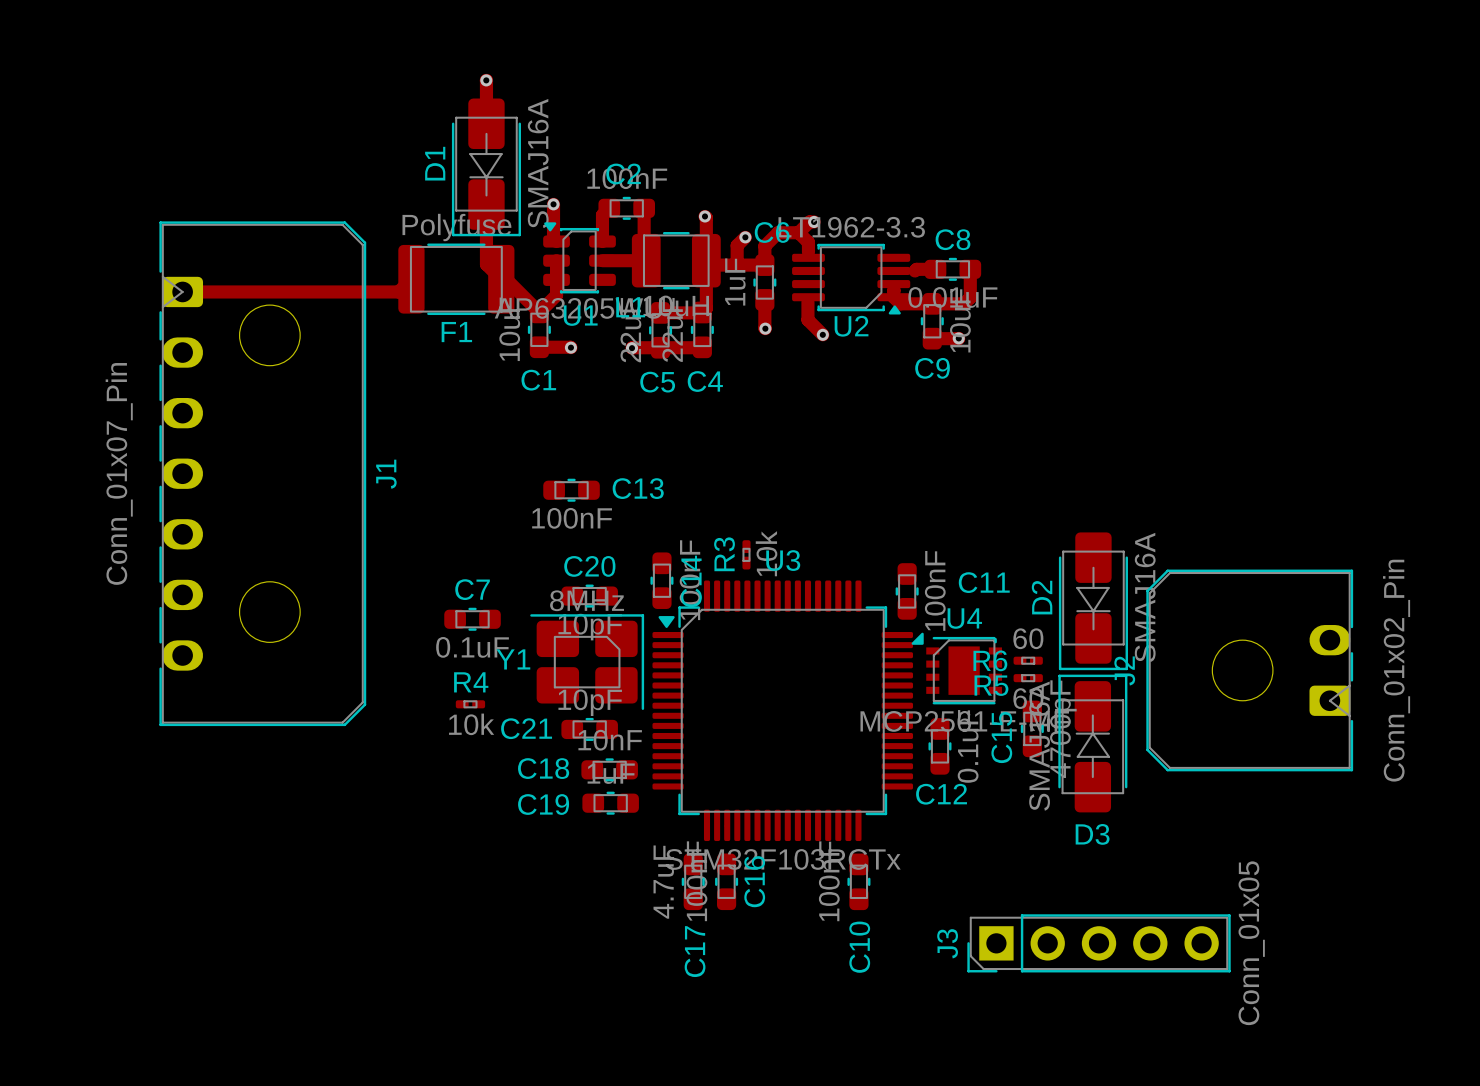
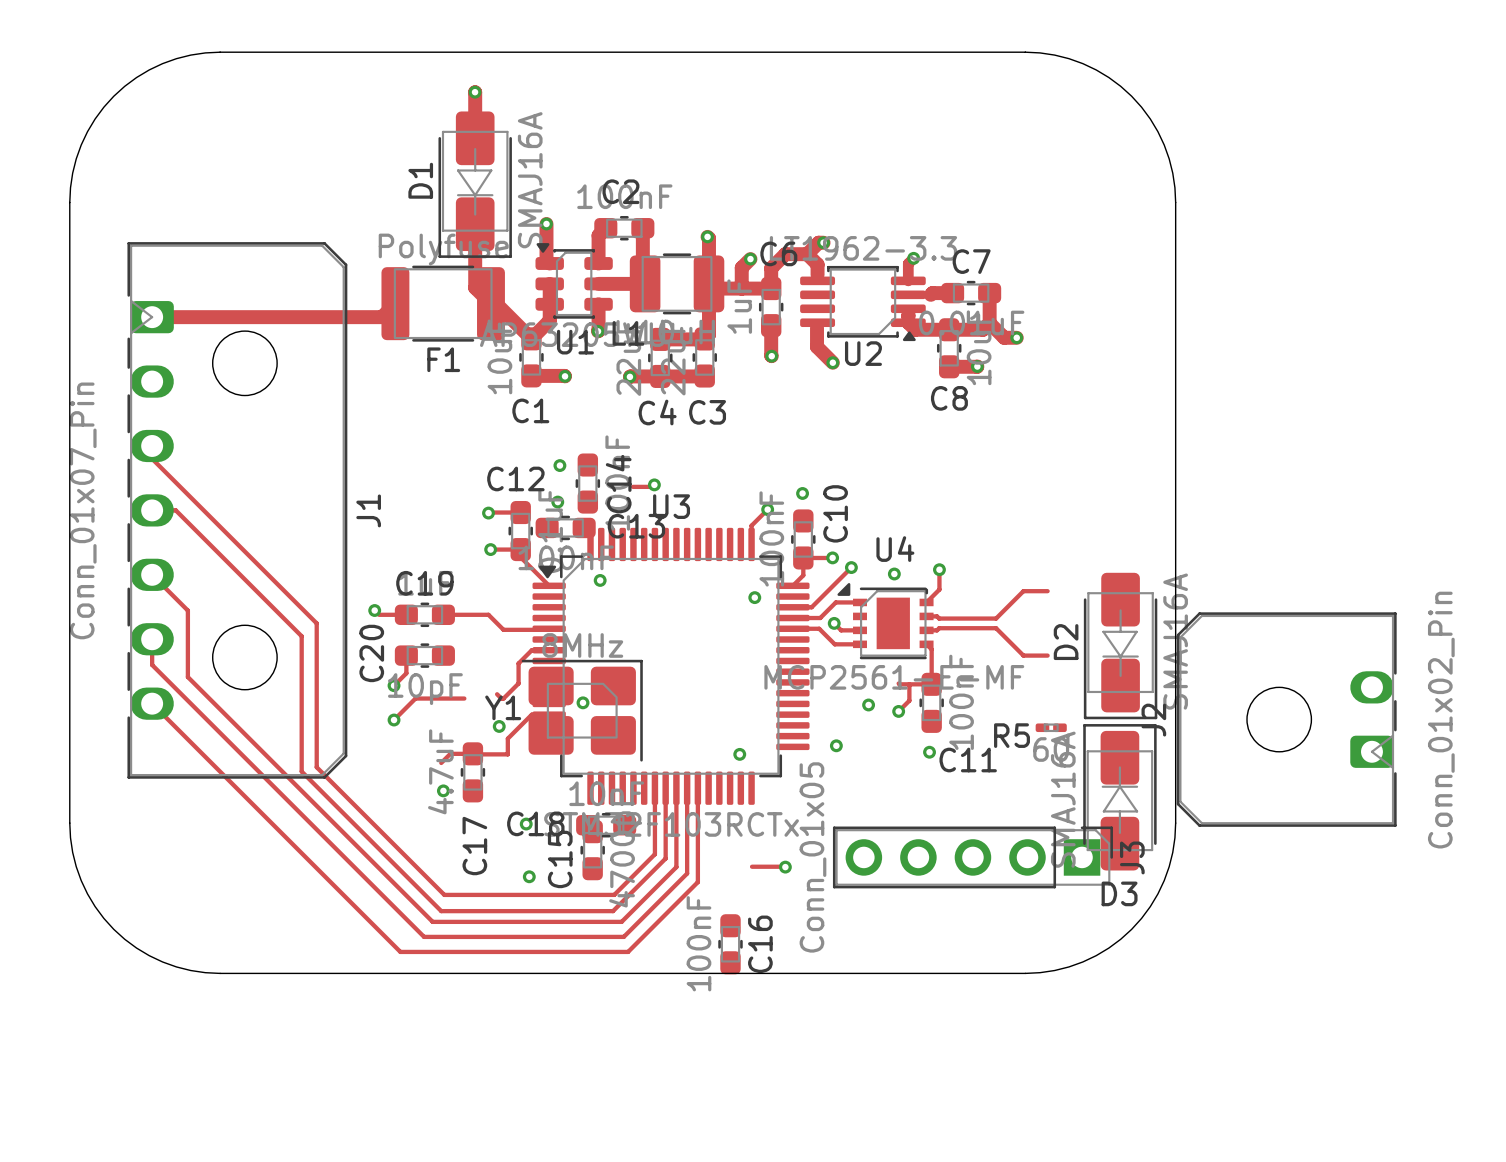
board edge: none -> (220, 52) (1025, 52) (1054, 55) (1082, 63) (1108, 77) (1131, 96) (1150, 119) (1164, 144) (1172, 173) (1175, 202) (1174, 837) (1169, 866) (1157, 893) (1131, 929) (1108, 948) (1082, 961) (1054, 970) (1025, 973) (220, 973) (190, 970) (162, 961) (136, 948) (113, 929) (87, 893) (76, 866) (70, 837) (70, 187) (76, 158) (87, 131) (103, 107) (124, 86) (149, 69) (176, 58) (220, 52)
track: none -> (913, 258) (908, 263) (908, 280)
via: none -> (913, 258)
C8 name: C8 (952, 239) -> C7 (971, 261)
track: none -> (598, 304) (598, 331)
track: none -> (989, 323) (1004, 337) (1016, 337)
via: none -> (598, 331)
via: none -> (1016, 337)
C9 name: C9 (932, 368) -> C8 (949, 398)
C4 name: C4 (705, 381) -> C3 (707, 412)
C5 name: C5 (657, 382) -> C4 (657, 412)
track: none -> (152, 445) (152, 458) (316, 623) (316, 767) (444, 894) (614, 894) (654, 854) (654, 788)
via: none -> (559, 465)
track: none -> (654, 484) (652, 486) (632, 486)
via: none -> (654, 484)
via: none -> (802, 493)
via: none -> (557, 502)
track: none -> (767, 509) (751, 525) (751, 544)
via: none -> (767, 509)
track: none -> (152, 510) (175, 510) (301, 636) (301, 771) (441, 911) (613, 911) (665, 858) (665, 788)
track: none -> (520, 512) (488, 513)
via: none -> (488, 513)
track: none -> (490, 549) (520, 549) (520, 557) (549, 585)
via: none -> (490, 549)
track: none -> (832, 557) (803, 557) (803, 575) (792, 585)
via: none -> (832, 557)
track: none -> (851, 567) (811, 607) (792, 607)
via: none -> (851, 567)
track: none -> (939, 569) (939, 589) (926, 602)
via: none -> (939, 569)
via: none -> (894, 574)
track: none -> (152, 574) (187, 610) (187, 677) (432, 921) (621, 921) (676, 867) (676, 788)
via: none -> (600, 580)
track: none -> (1047, 591) (1023, 591) (996, 618) (939, 618) (937, 616) (926, 616)
R3: 10k (746, 554) -> none
via: none -> (754, 597)
track: none -> (860, 602) (835, 602) (820, 618) (792, 618)
C20 name rotation: 0° (589, 566) -> 90° counterclockwise (371, 653)
via: none -> (374, 610)
track: none -> (379, 614) (406, 614)
track: none -> (443, 614) (488, 614) (503, 629) (549, 628)
track: none -> (834, 623) (841, 630) (860, 630)
via: none -> (834, 623)
C14 position: (661, 580) -> (587, 483)
C11 name position: C11 (984, 582) -> C11 (968, 760)
track: none -> (792, 628) (819, 628) (834, 644) (860, 644)
track: none -> (926, 630) (937, 630) (939, 628) (996, 628) (1023, 655) (1047, 655)
C11 position: (907, 591) -> (931, 702)
track: none -> (152, 639) (152, 664) (424, 936) (623, 936) (687, 873) (687, 788)
C20 position: (589, 596) -> (424, 655)
track: none -> (926, 644) (931, 649) (931, 684) (898, 683)
track: none -> (549, 650) (531, 650) (518, 663) (518, 683) (503, 698) (497, 694)
track: none -> (406, 655) (406, 673) (394, 685)
U4 name position: U4 (964, 618) -> U4 (895, 549)
C7: 0.1uF (472, 619) -> none
track: none -> (909, 684) (909, 700) (898, 711)
via: none -> (394, 685)
track: none -> (464, 698) (415, 698) (394, 720)
via: none -> (582, 702)
track: none -> (152, 703) (400, 951) (628, 951) (697, 882) (697, 788)
via: none -> (868, 704)
R6: 60 (1028, 660) -> none
via: none -> (898, 711)
track: none -> (549, 714) (531, 714) (507, 738) (507, 754) (450, 753) (441, 762)
U4 position: (956, 668) -> (885, 621)
via: none -> (394, 720)
via: none -> (499, 726)
via: none -> (836, 745)
via: none -> (929, 752)
via: none -> (739, 754)
R4: 10k (470, 704) -> none
U3 position: (782, 710) -> (671, 666)
C15 position: (1032, 728) -> (592, 850)
C21: 10pF (589, 729) -> none
via: none -> (443, 790)
C12 position: (939, 746) -> (520, 531)
via: none -> (526, 824)
C12 name position: C12 (941, 794) -> C12 (515, 478)
C19 position: (610, 803) -> (424, 614)
C19 name position: C19 (543, 804) -> C19 (424, 583)
track: none -> (752, 866) (785, 867)
via: none -> (785, 867)
via: none -> (529, 876)
C17 position: (693, 881) -> (472, 772)
C10 position: (858, 881) -> (803, 539)
J3 rotation: 0° (1099, 943) -> 180° (972, 857)
J3 position: (1099, 943) -> (972, 857)
C10 name position: C10 (859, 947) -> C10 (835, 513)

